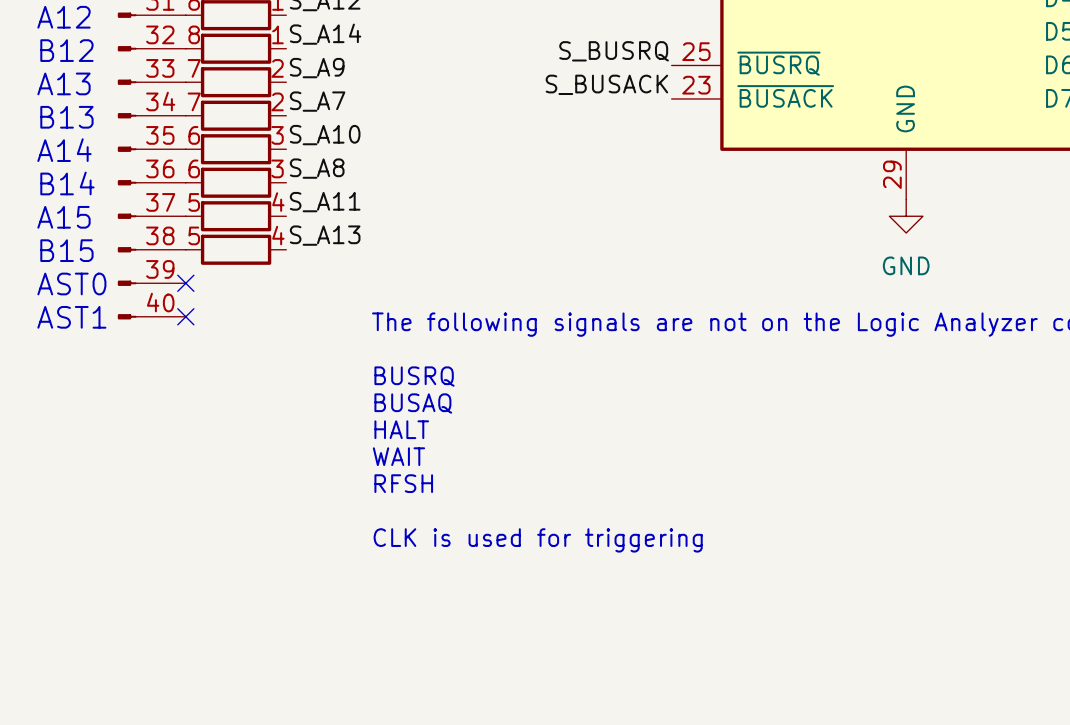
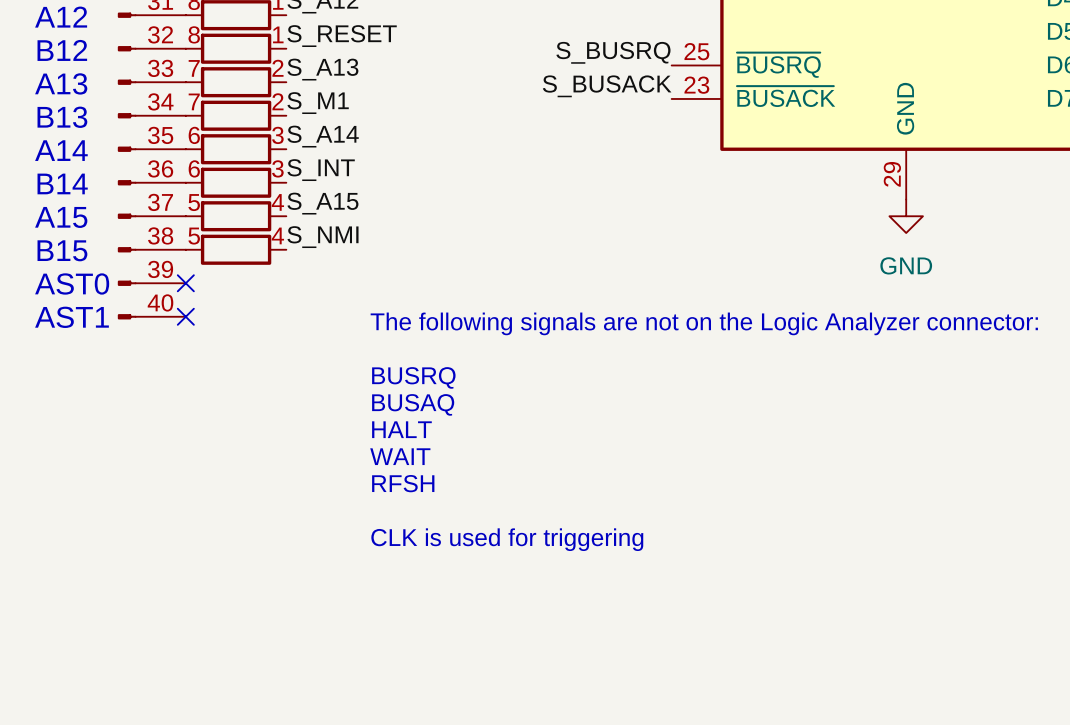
label: S_A14 (325, 34) -> S_RESET (342, 36)
label: S_A9 (317, 68) -> S_A13 (322, 69)
label: S_A7 (317, 101) -> S_M1 (318, 103)
label: S_A10 (325, 135) -> S_A14 (323, 136)
label: S_A8 (317, 168) -> S_INT (321, 170)
label: S_A11 (325, 202) -> S_A15 (322, 203)
label: S_A13 (325, 235) -> S_NMI (322, 237)

